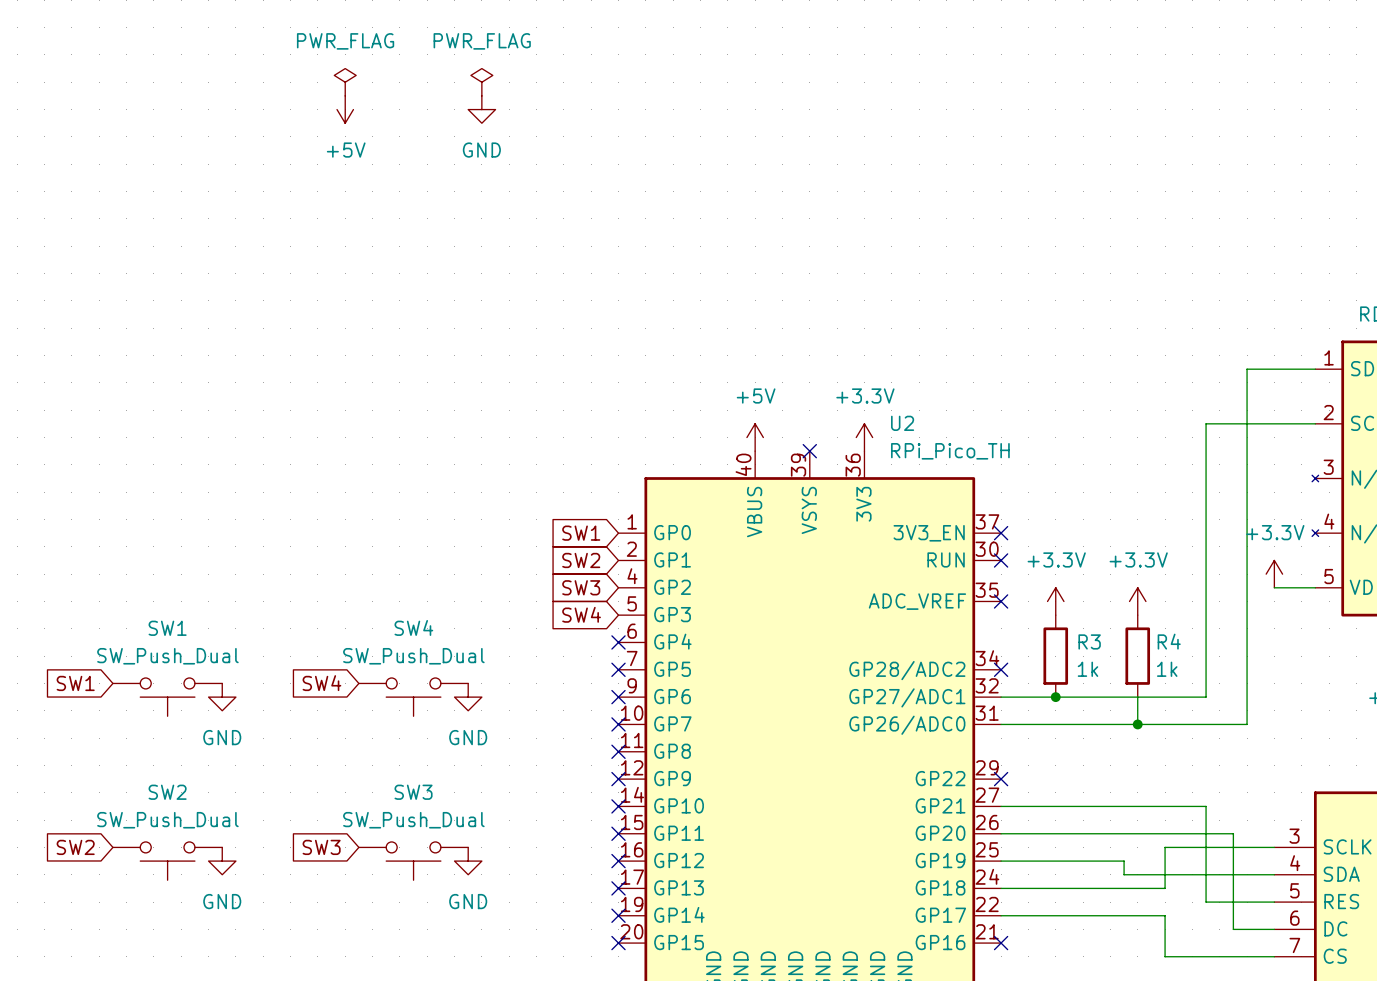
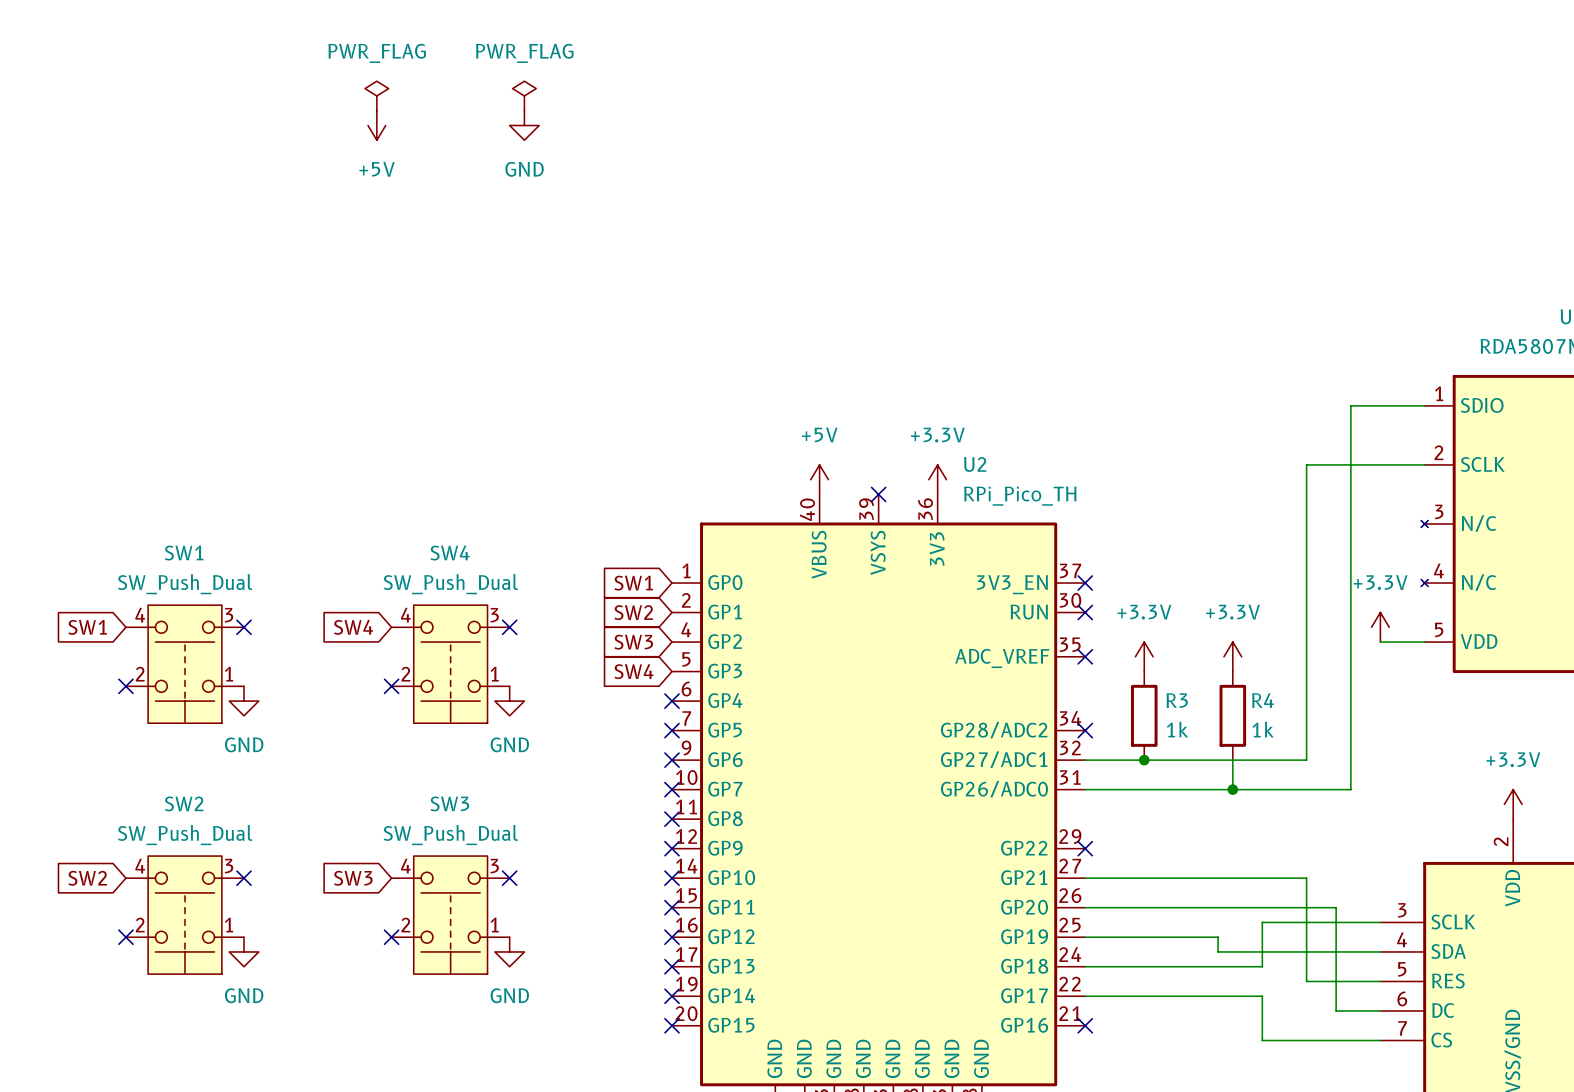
no-connect mark: none -> (244, 627)
no-connect mark: none -> (509, 627)
SW4 name position: SW4 (413, 627) -> SW4 (450, 553)
no-connect mark: none -> (125, 686)
SW1 name position: SW1 (167, 628) -> SW1 (184, 553)
no-connect mark: none -> (391, 686)
SW1 value position: SW_Push_Dual (167, 656) -> SW_Push_Dual (185, 584)
SW4 value position: SW_Push_Dual (413, 656) -> SW_Push_Dual (450, 584)
SW1 symbol: [112, 677, 223, 717] -> [125, 605, 245, 724]
SW4 symbol: [358, 677, 469, 717] -> [391, 605, 510, 724]
global label position: SW1 (75, 683) -> SW1 (87, 627)
global label position: SW4 (321, 683) -> SW4 (353, 627)
power symbol position: GND (222, 697) -> GND (244, 701)
power symbol position: GND (468, 697) -> GND (509, 701)
SW2 name position: SW2 (167, 792) -> SW2 (184, 803)
SW3 name position: SW3 (413, 792) -> SW3 (449, 803)
no-connect mark: none -> (244, 878)
no-connect mark: none -> (509, 878)
SW2 value position: SW_Push_Dual (167, 820) -> SW_Push_Dual (185, 835)
SW3 value position: SW_Push_Dual (413, 820) -> SW_Push_Dual (450, 835)
SW2 symbol: [112, 841, 223, 881] -> [125, 856, 245, 975]
SW3 symbol: [358, 841, 469, 881] -> [391, 856, 510, 975]
global label position: SW2 (75, 847) -> SW2 (87, 878)
global label position: SW3 (321, 847) -> SW3 (353, 878)
no-connect mark: none -> (125, 937)
power symbol position: GND (222, 861) -> GND (244, 951)
no-connect mark: none -> (391, 937)
power symbol position: GND (468, 861) -> GND (509, 951)

